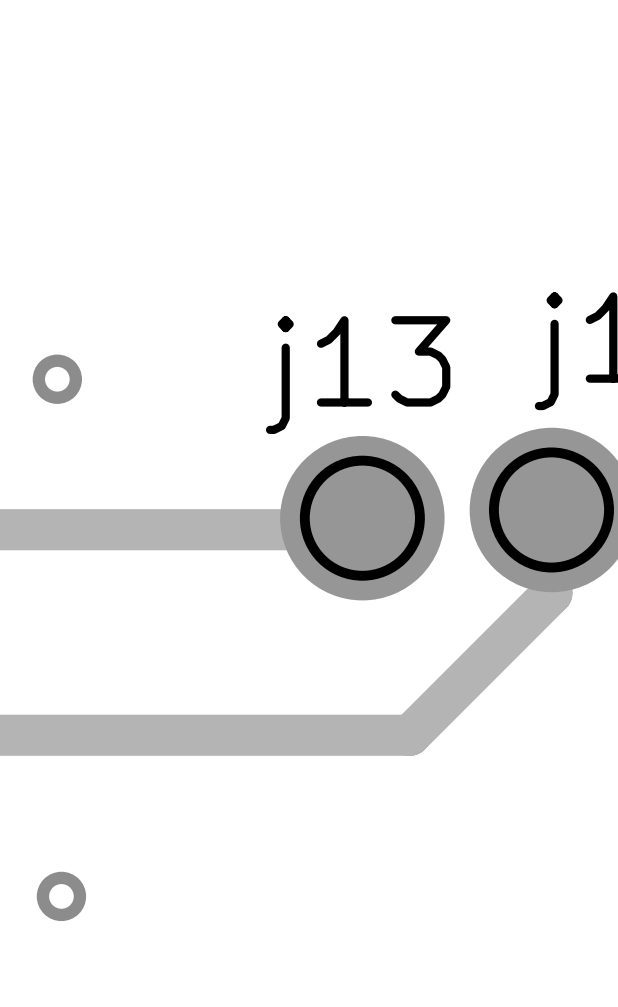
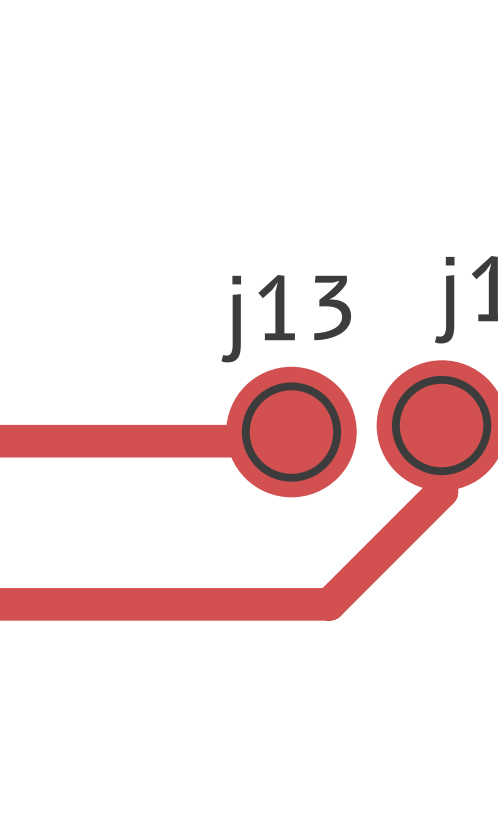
via: (57, 379) -> none
via: (61, 896) -> none

